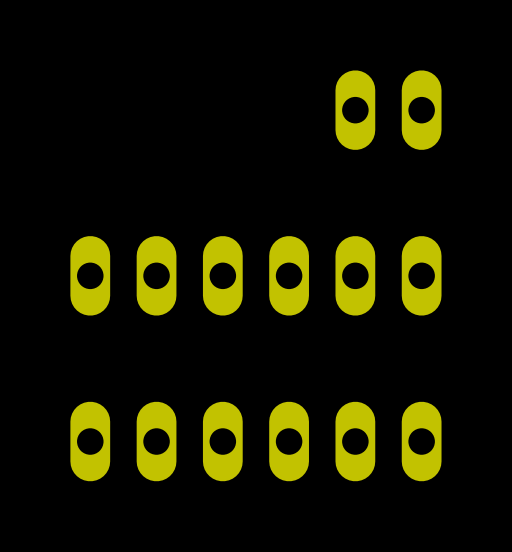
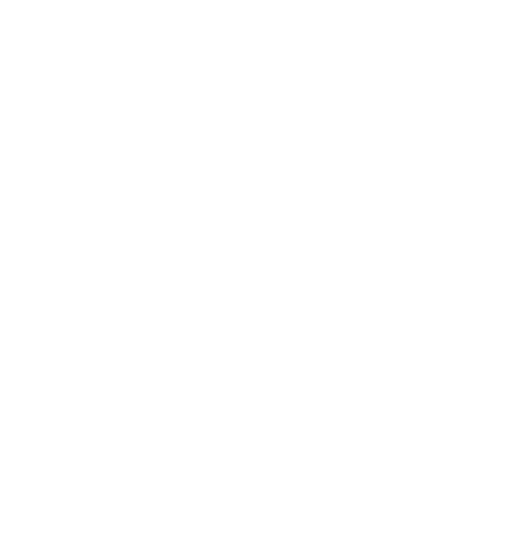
part: (388, 110) -> none
part: (255, 275) -> none
part: (255, 441) -> none

